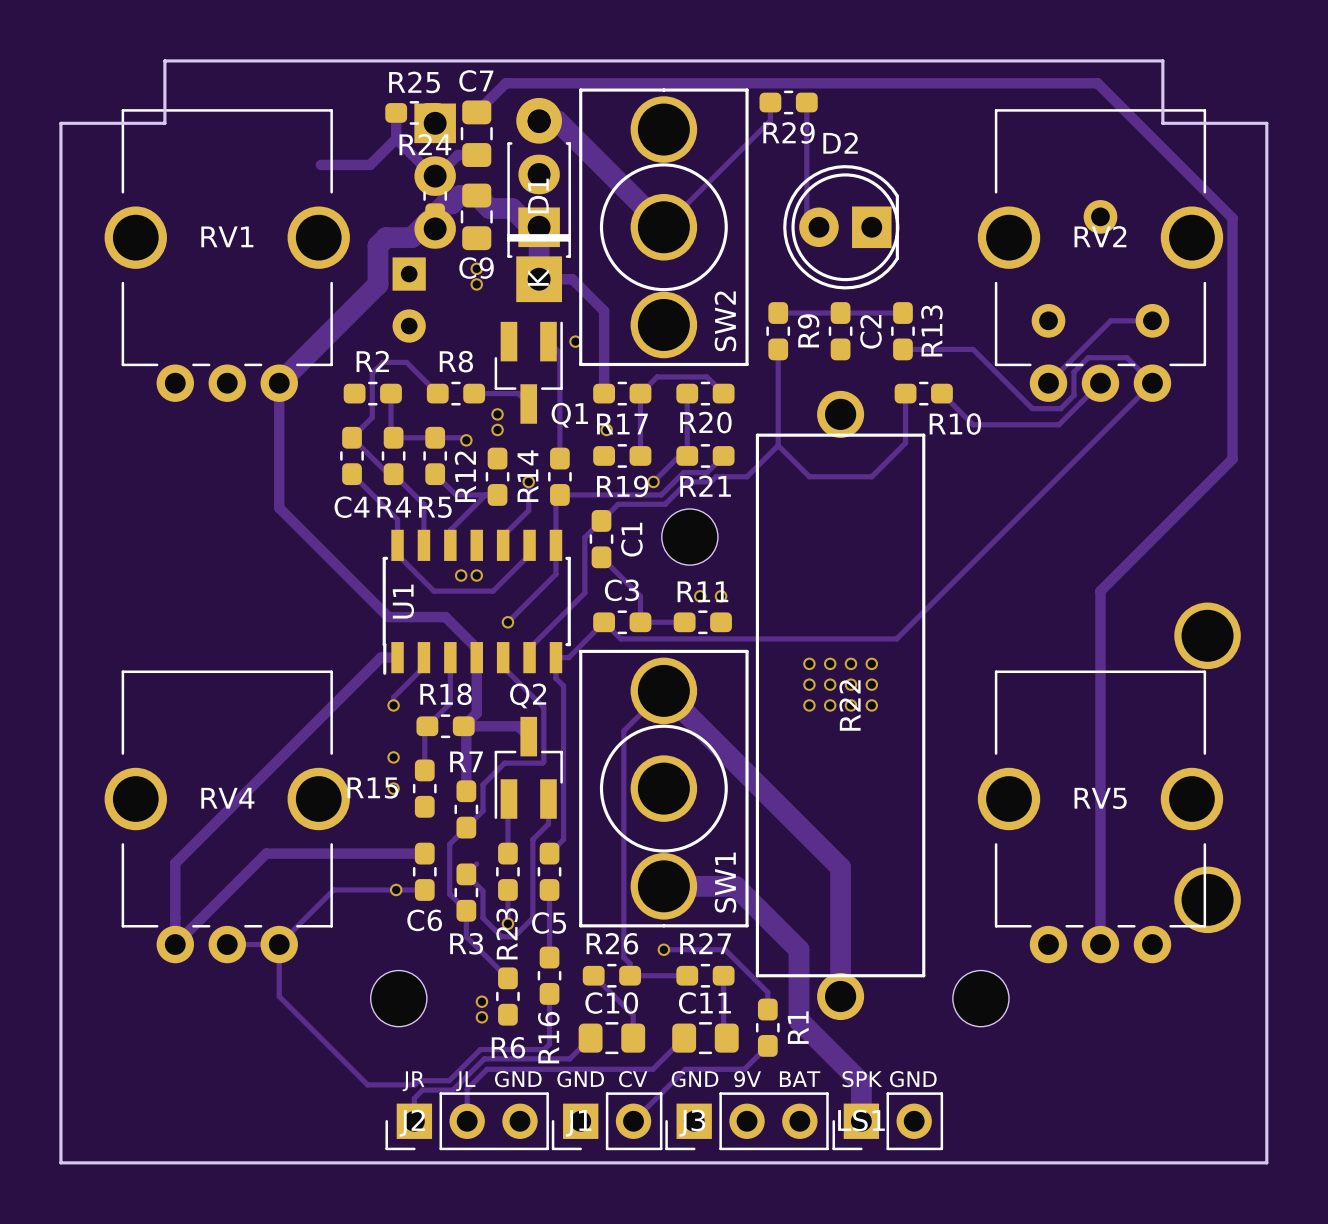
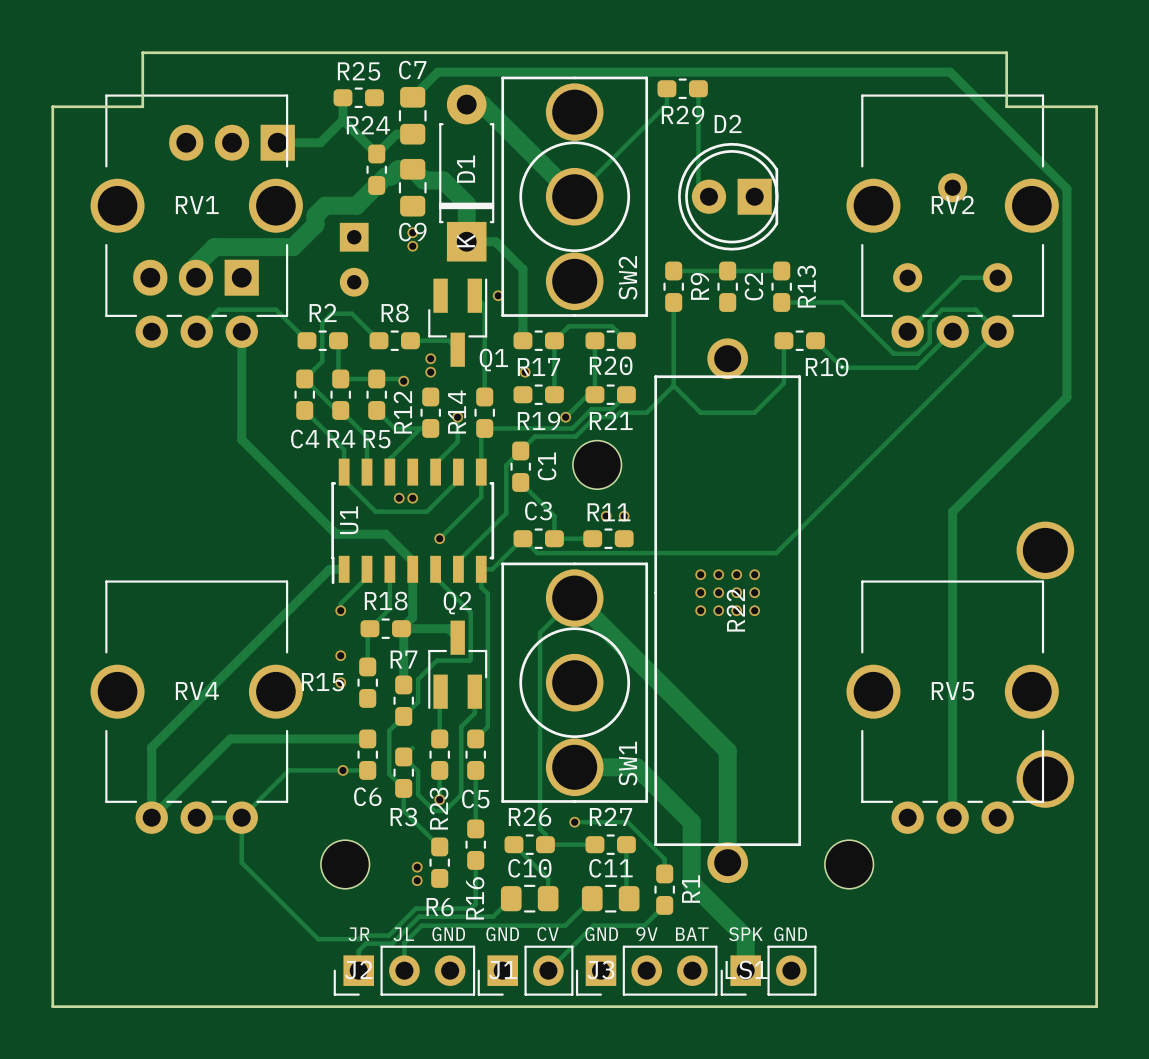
part: none -> (232, 142)
part: (539, 174) -> none
part: (435, 176) -> none
track: (386, 237) (378, 245) (378, 284) (279, 383) -> (334, 205) (325, 205) (315, 215) (315, 224) (293, 247) (214, 247) (196, 265) (196, 277)
part: none -> (196, 277)
track: none -> (196, 331) (218, 309) (275, 309) (306, 340)

